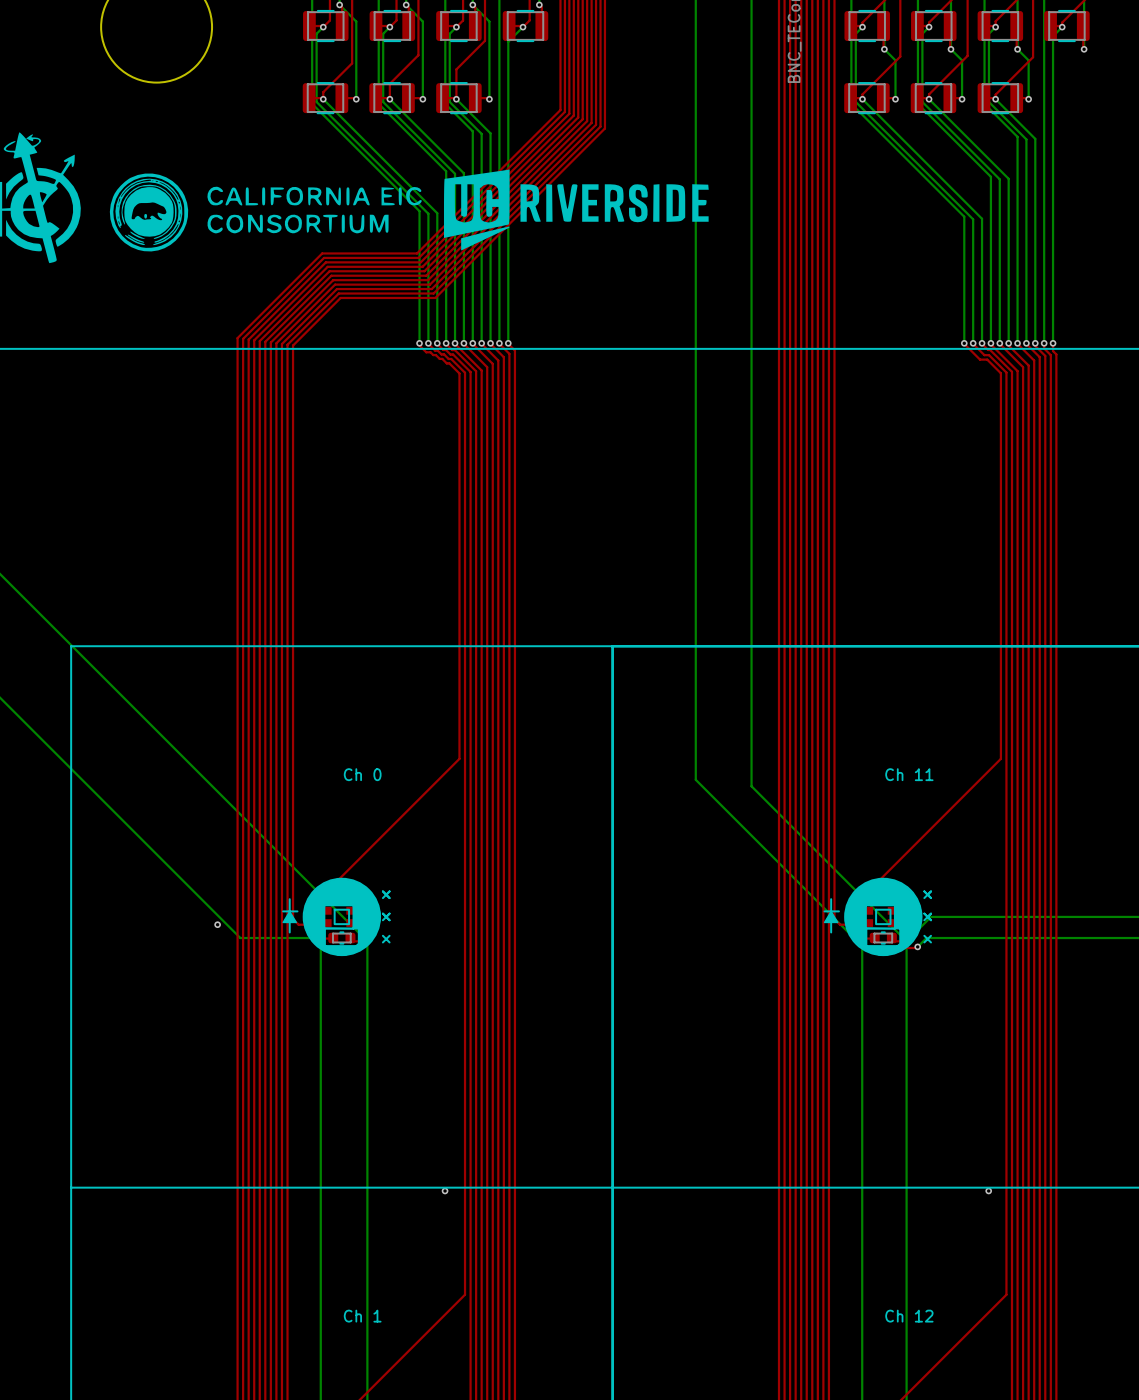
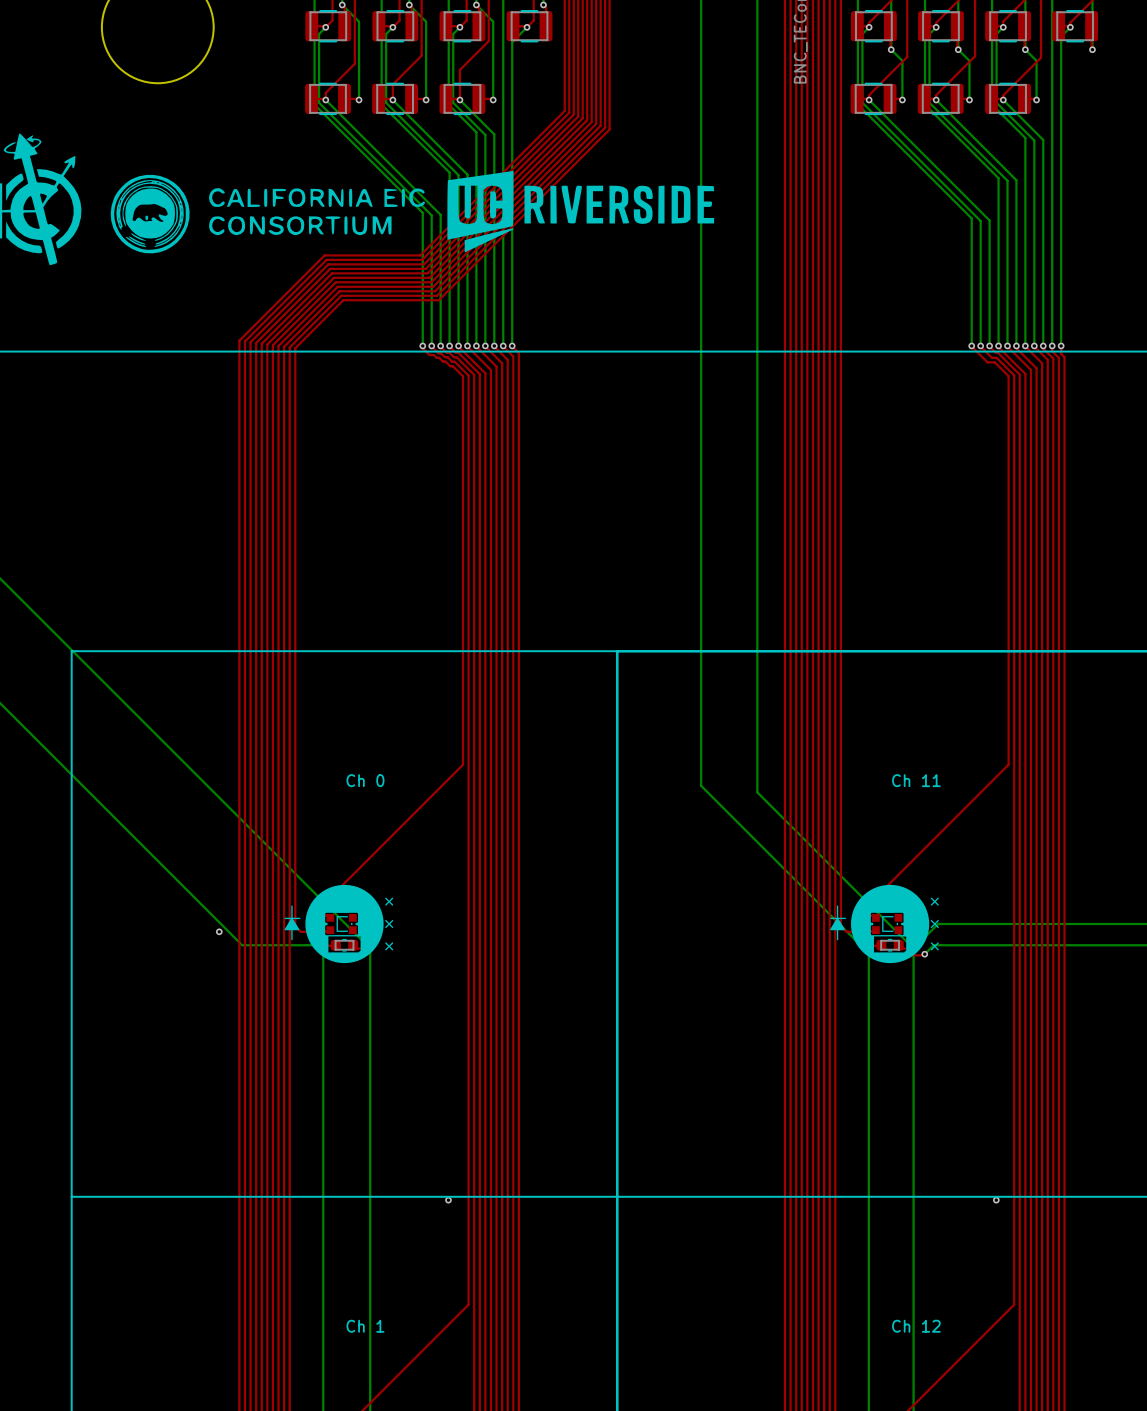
part footprint: [282, 878, 391, 956] -> [284, 884, 394, 964]
part footprint: [823, 878, 932, 956] -> [830, 884, 939, 964]

